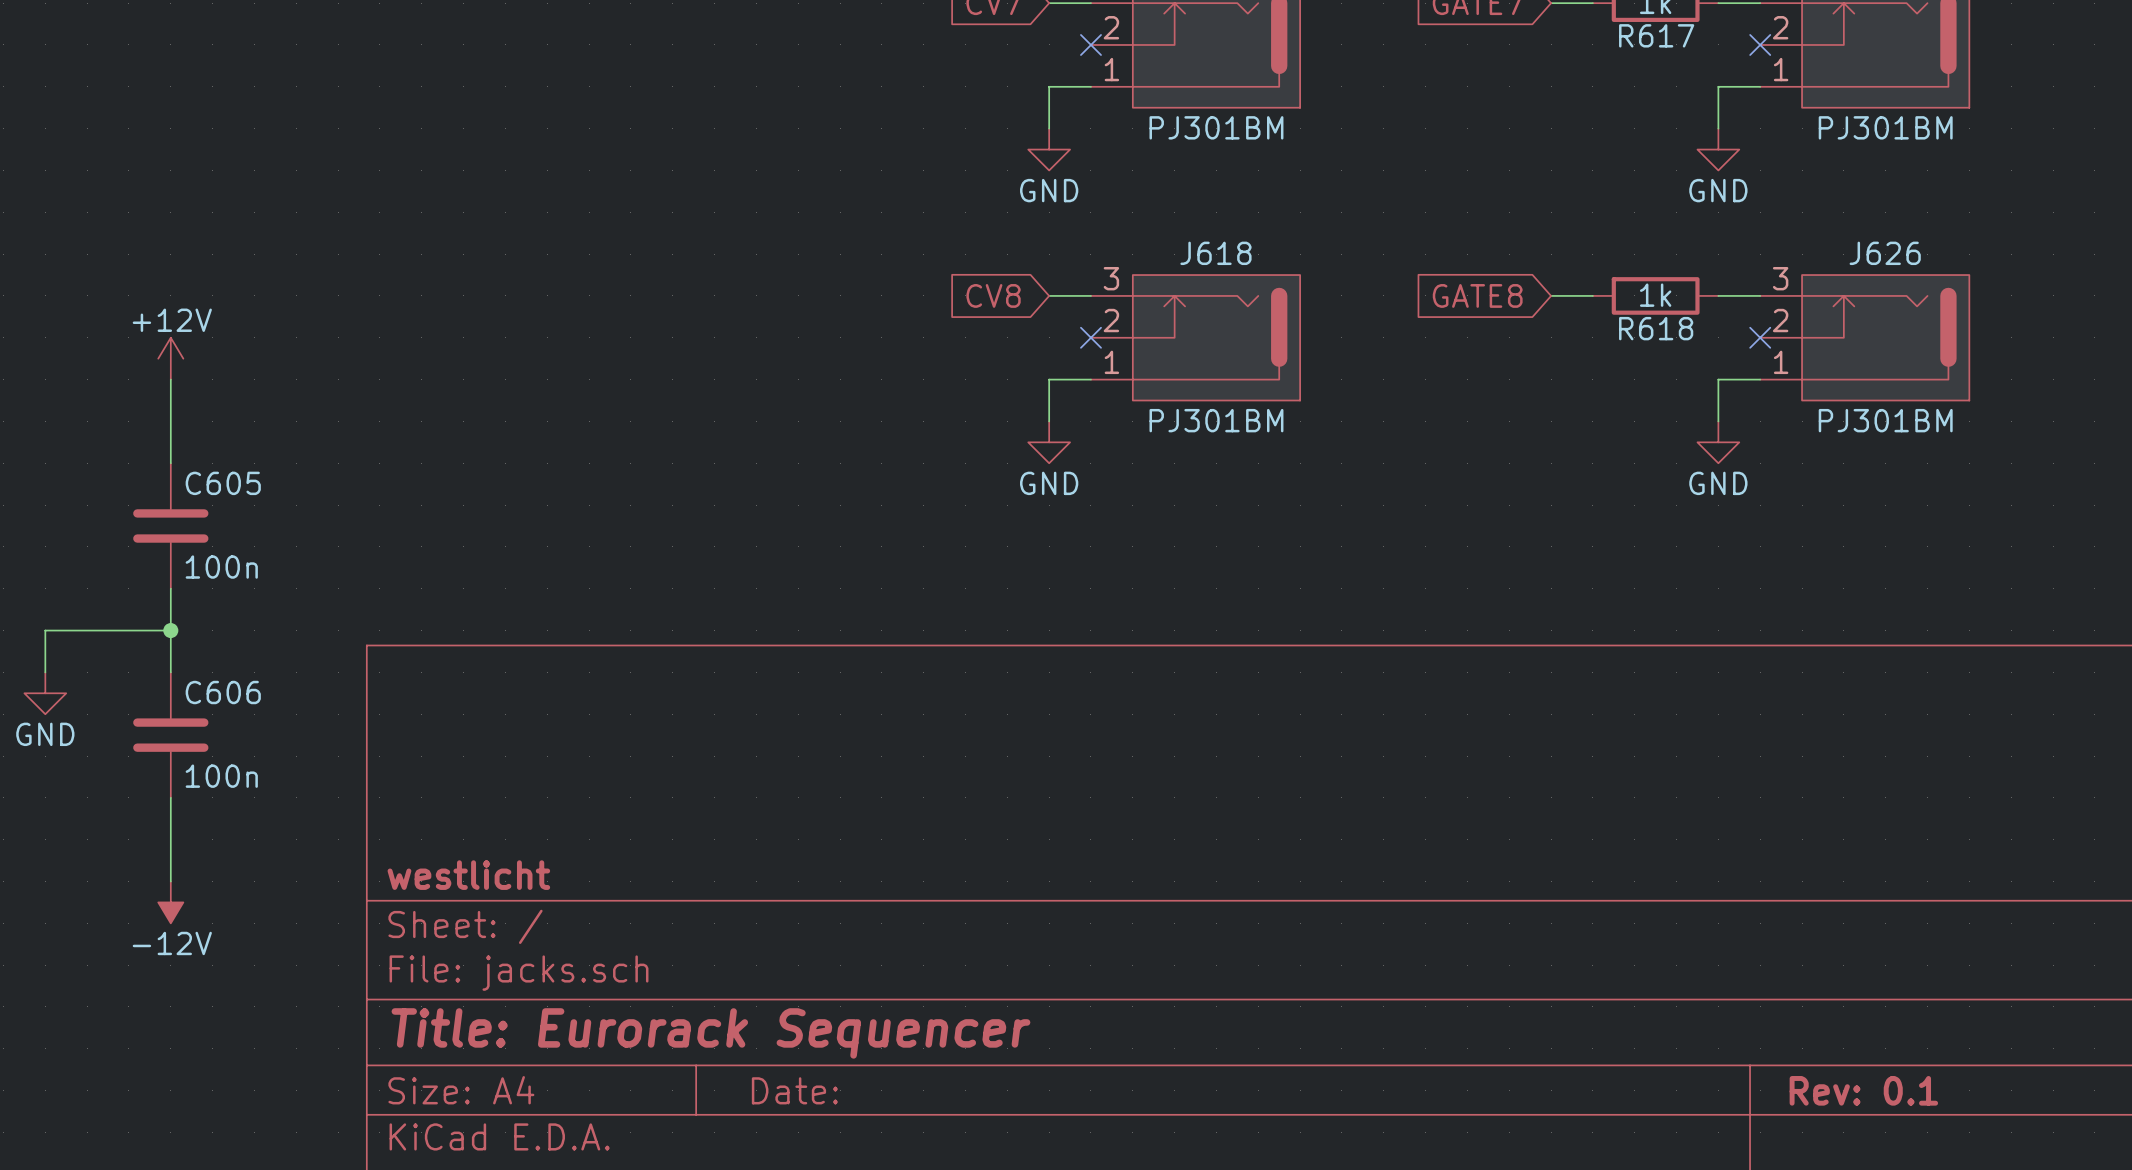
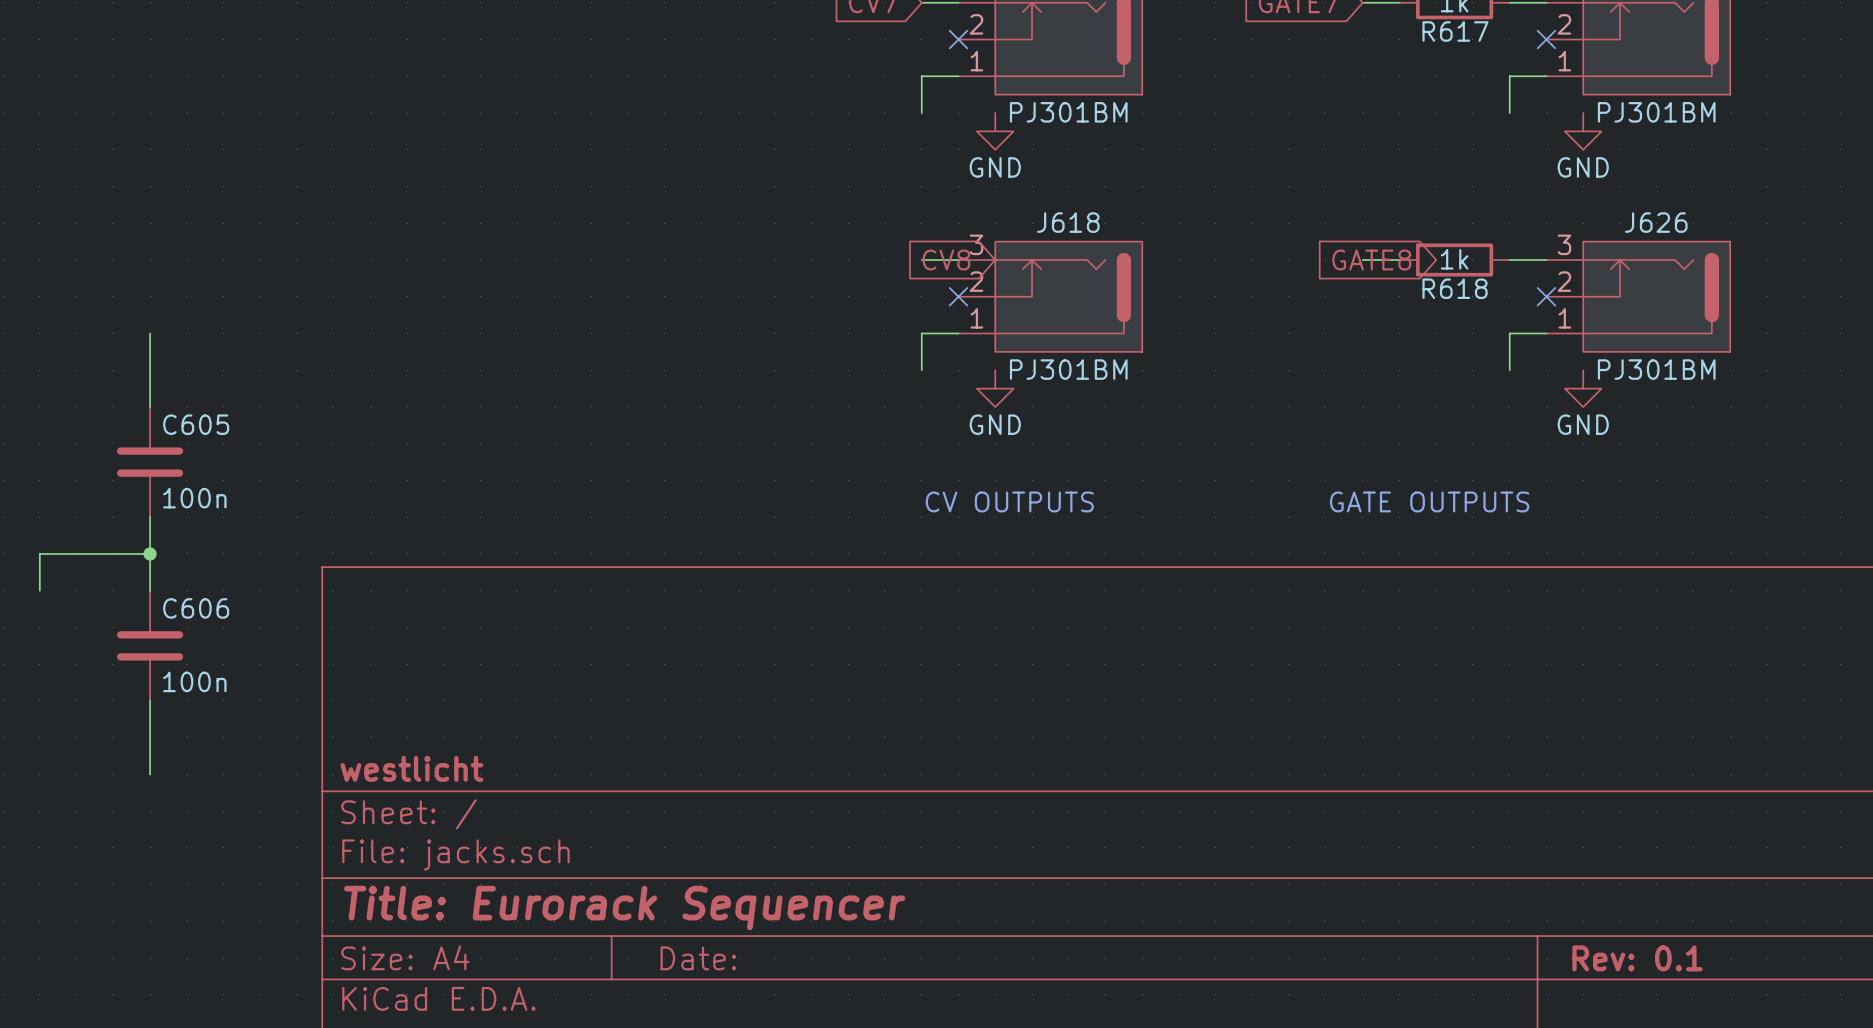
power symbol position: GND (1049, 149) -> GND (995, 131)
power symbol position: GND (1718, 149) -> GND (1583, 131)
global label position: CV8 (993, 295) -> CV8 (946, 260)
global label position: GATE8 (1477, 295) -> GATE8 (1371, 260)
power symbol: +12V (170, 358) -> none
power symbol position: GND (1049, 442) -> GND (995, 388)
power symbol position: GND (1718, 442) -> GND (1583, 388)
text: none -> CV OUTPUTS (1009, 501)
text: none -> GATE OUTPUTS (1429, 501)
power symbol: GND (45, 693) -> none
power symbol: -12V (170, 902) -> none

